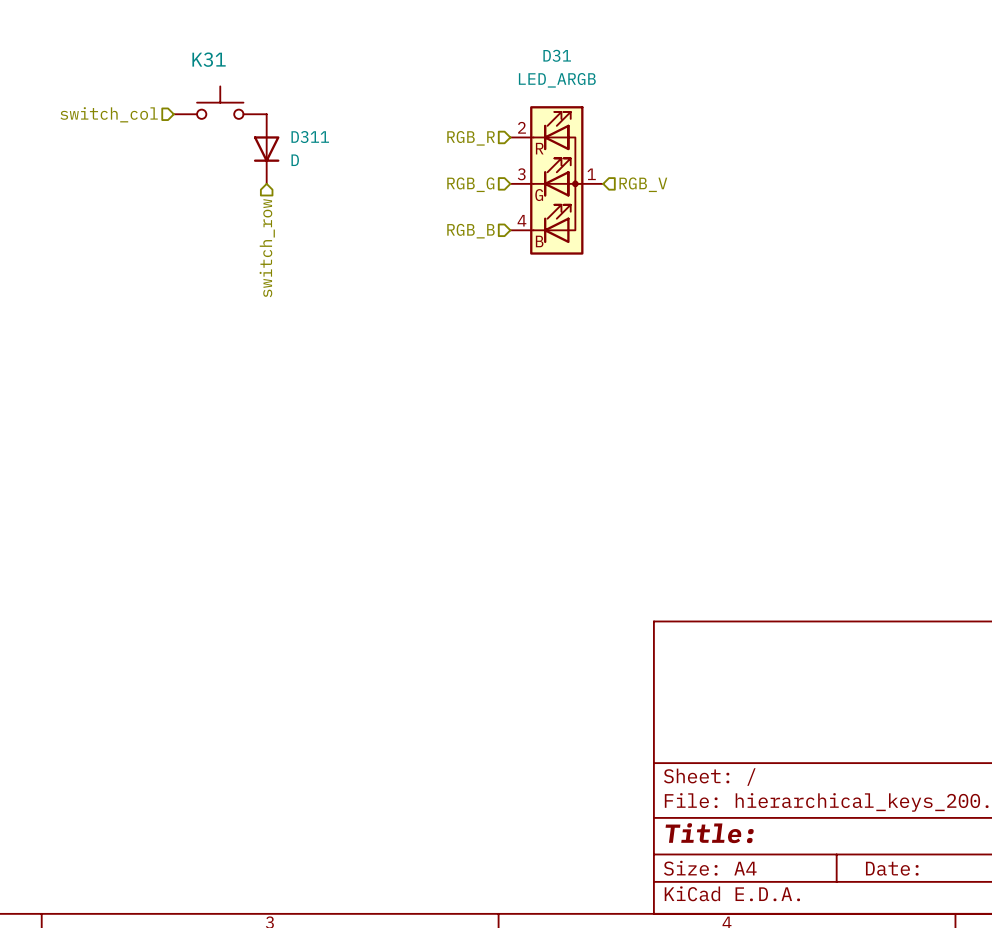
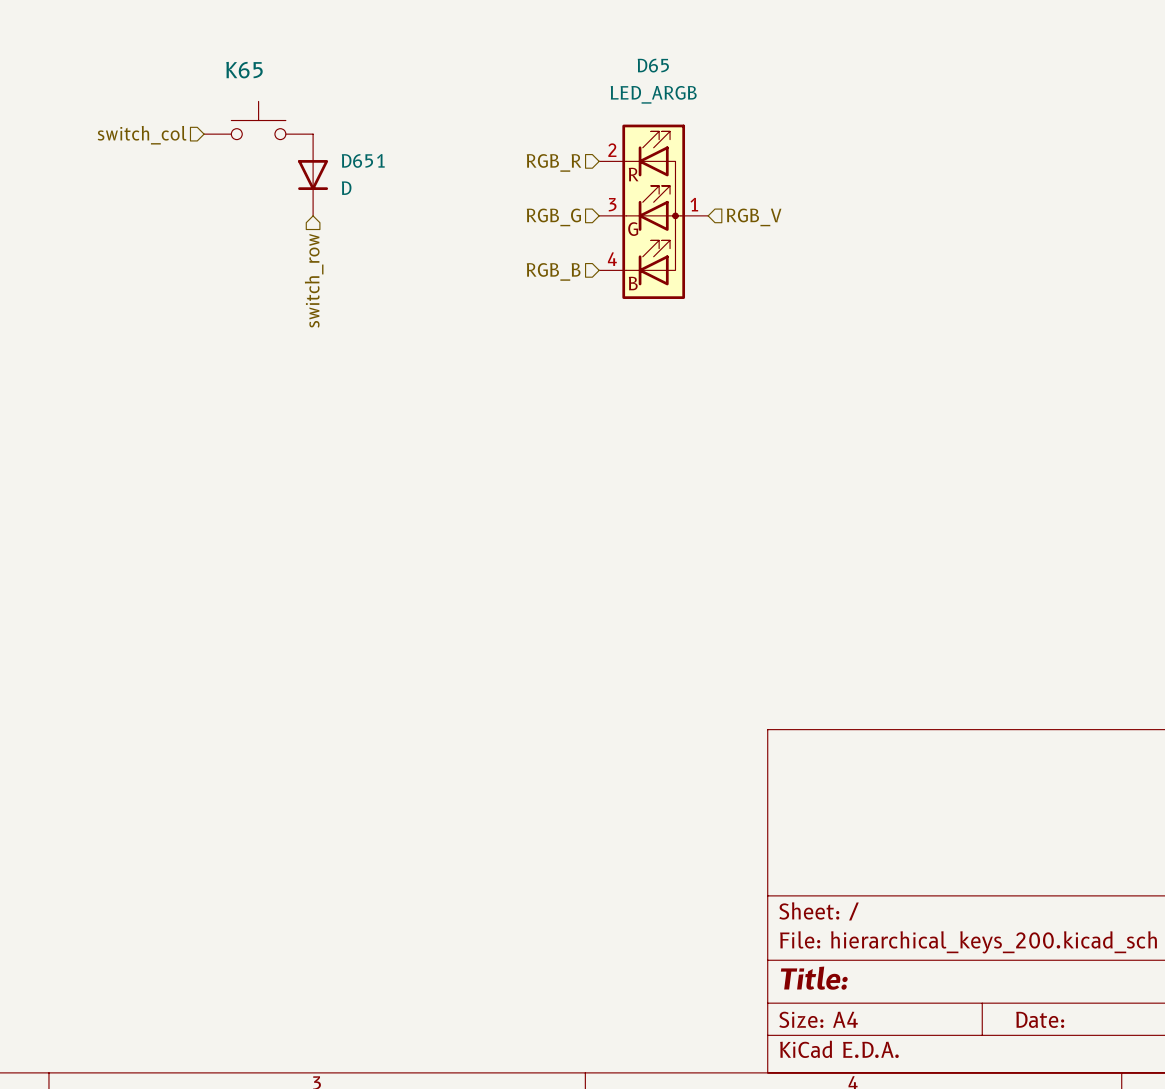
D31 name: D31 (557, 55) -> D65 (653, 65)
K31 name: K31 (209, 59) -> K65 (244, 70)
D311 name: D311 (310, 137) -> D651 (363, 160)

